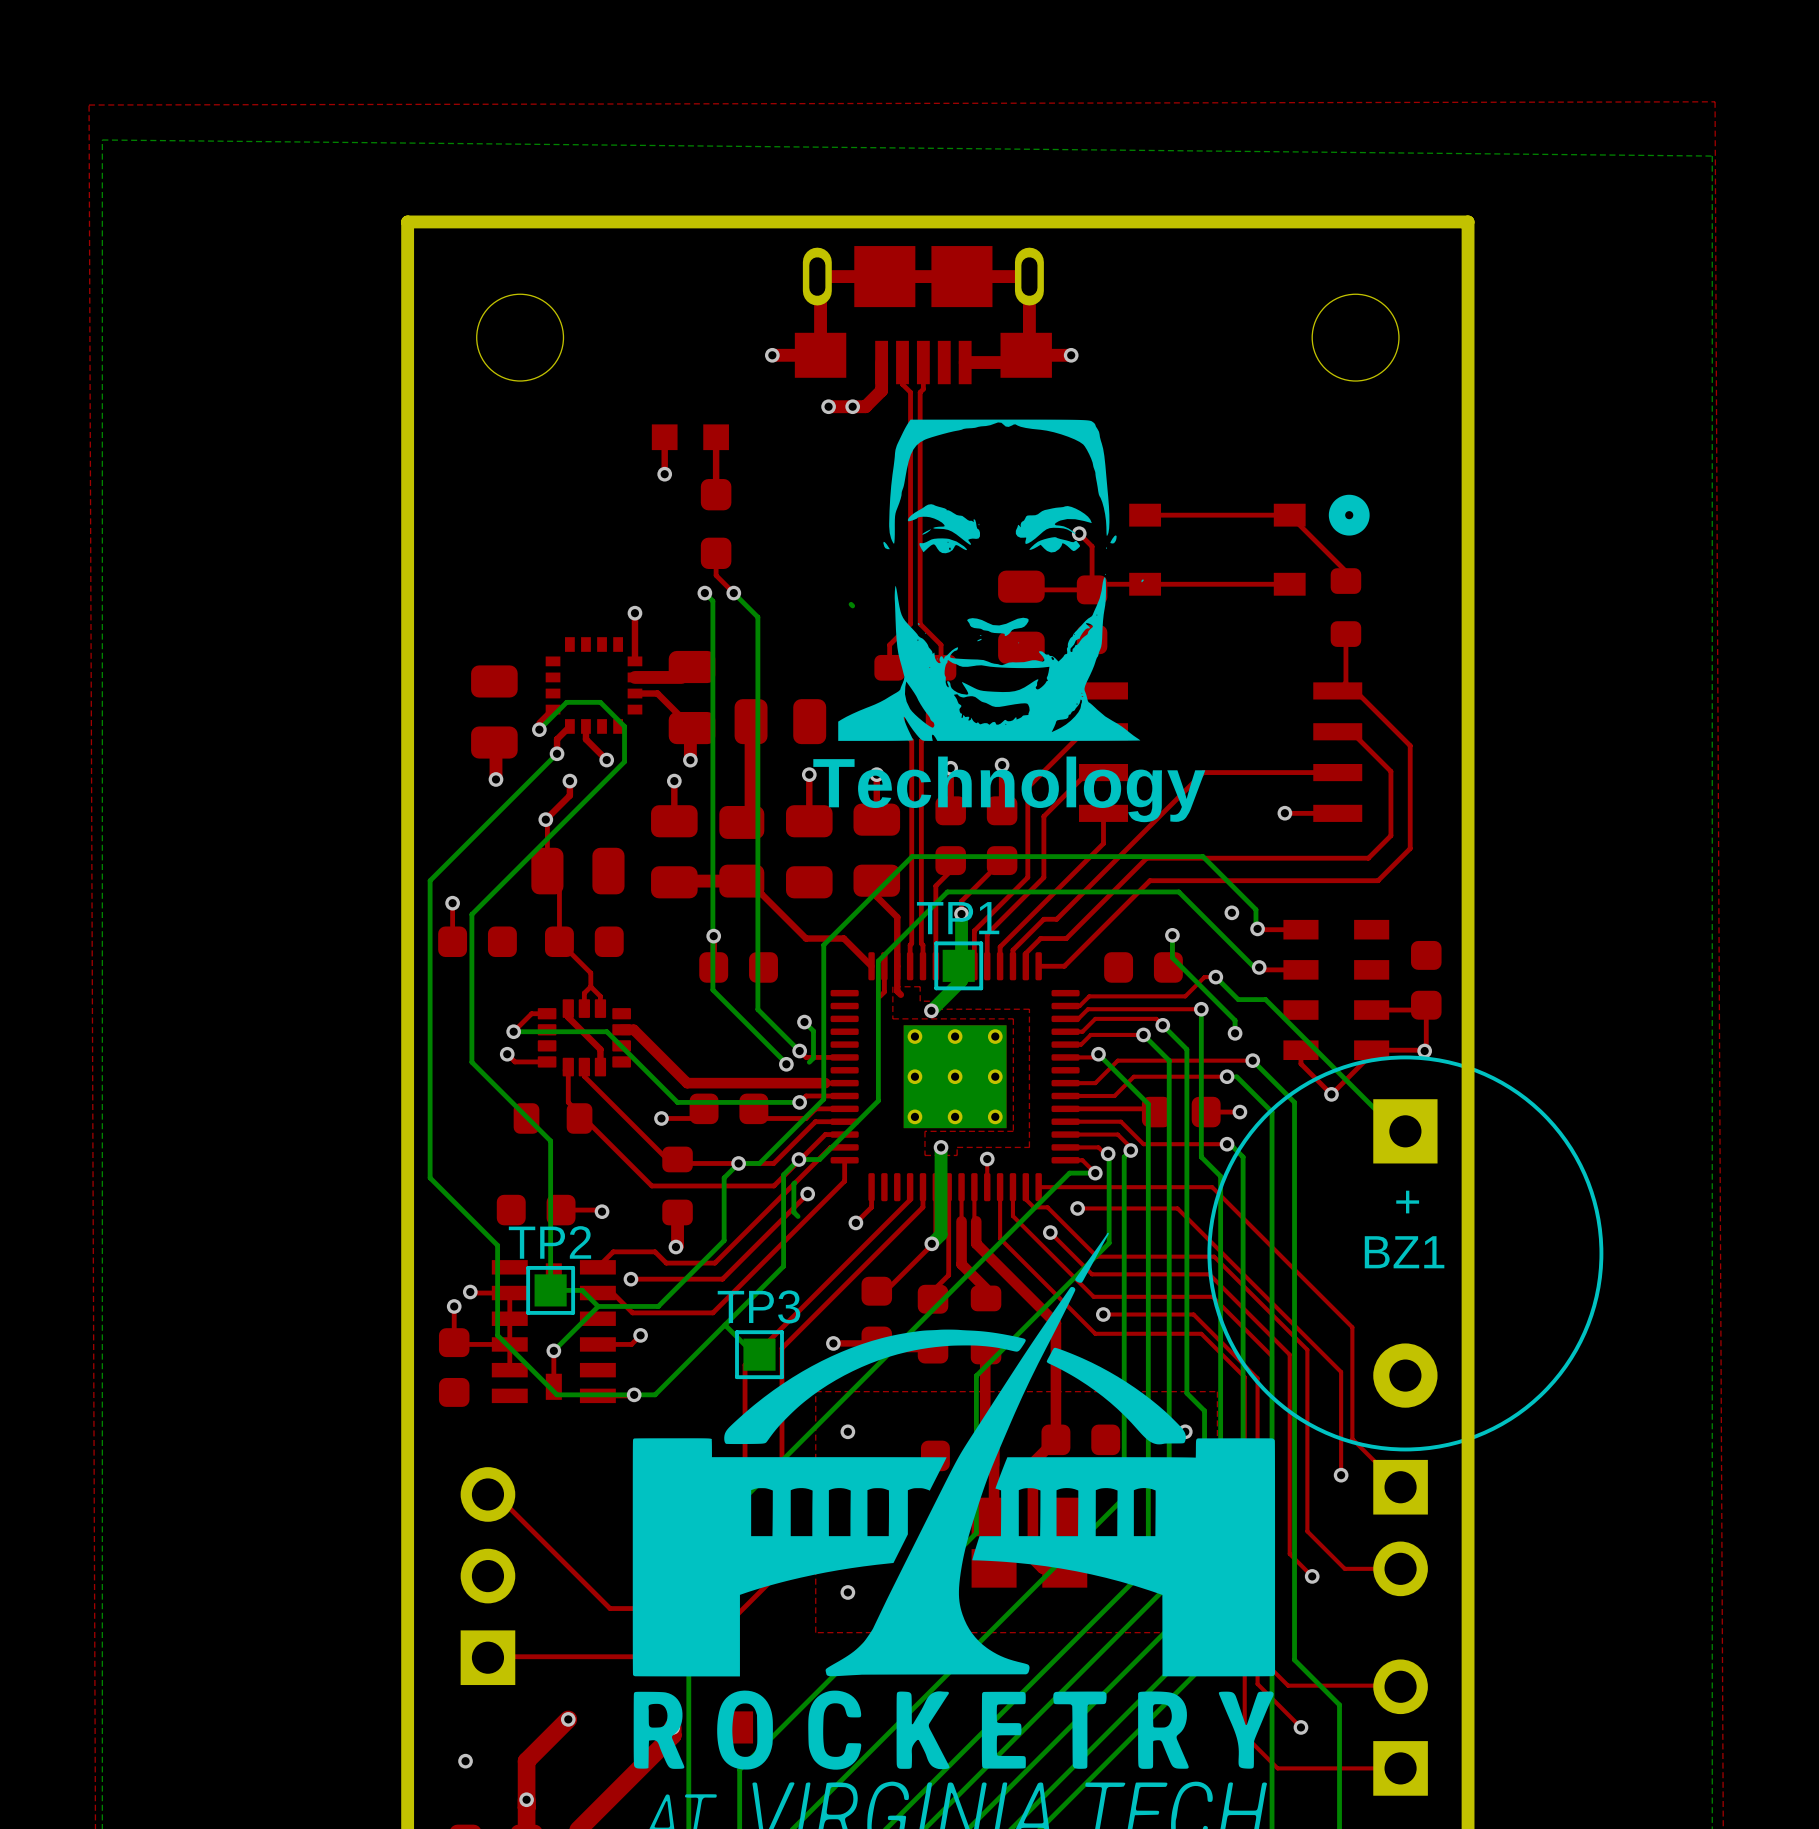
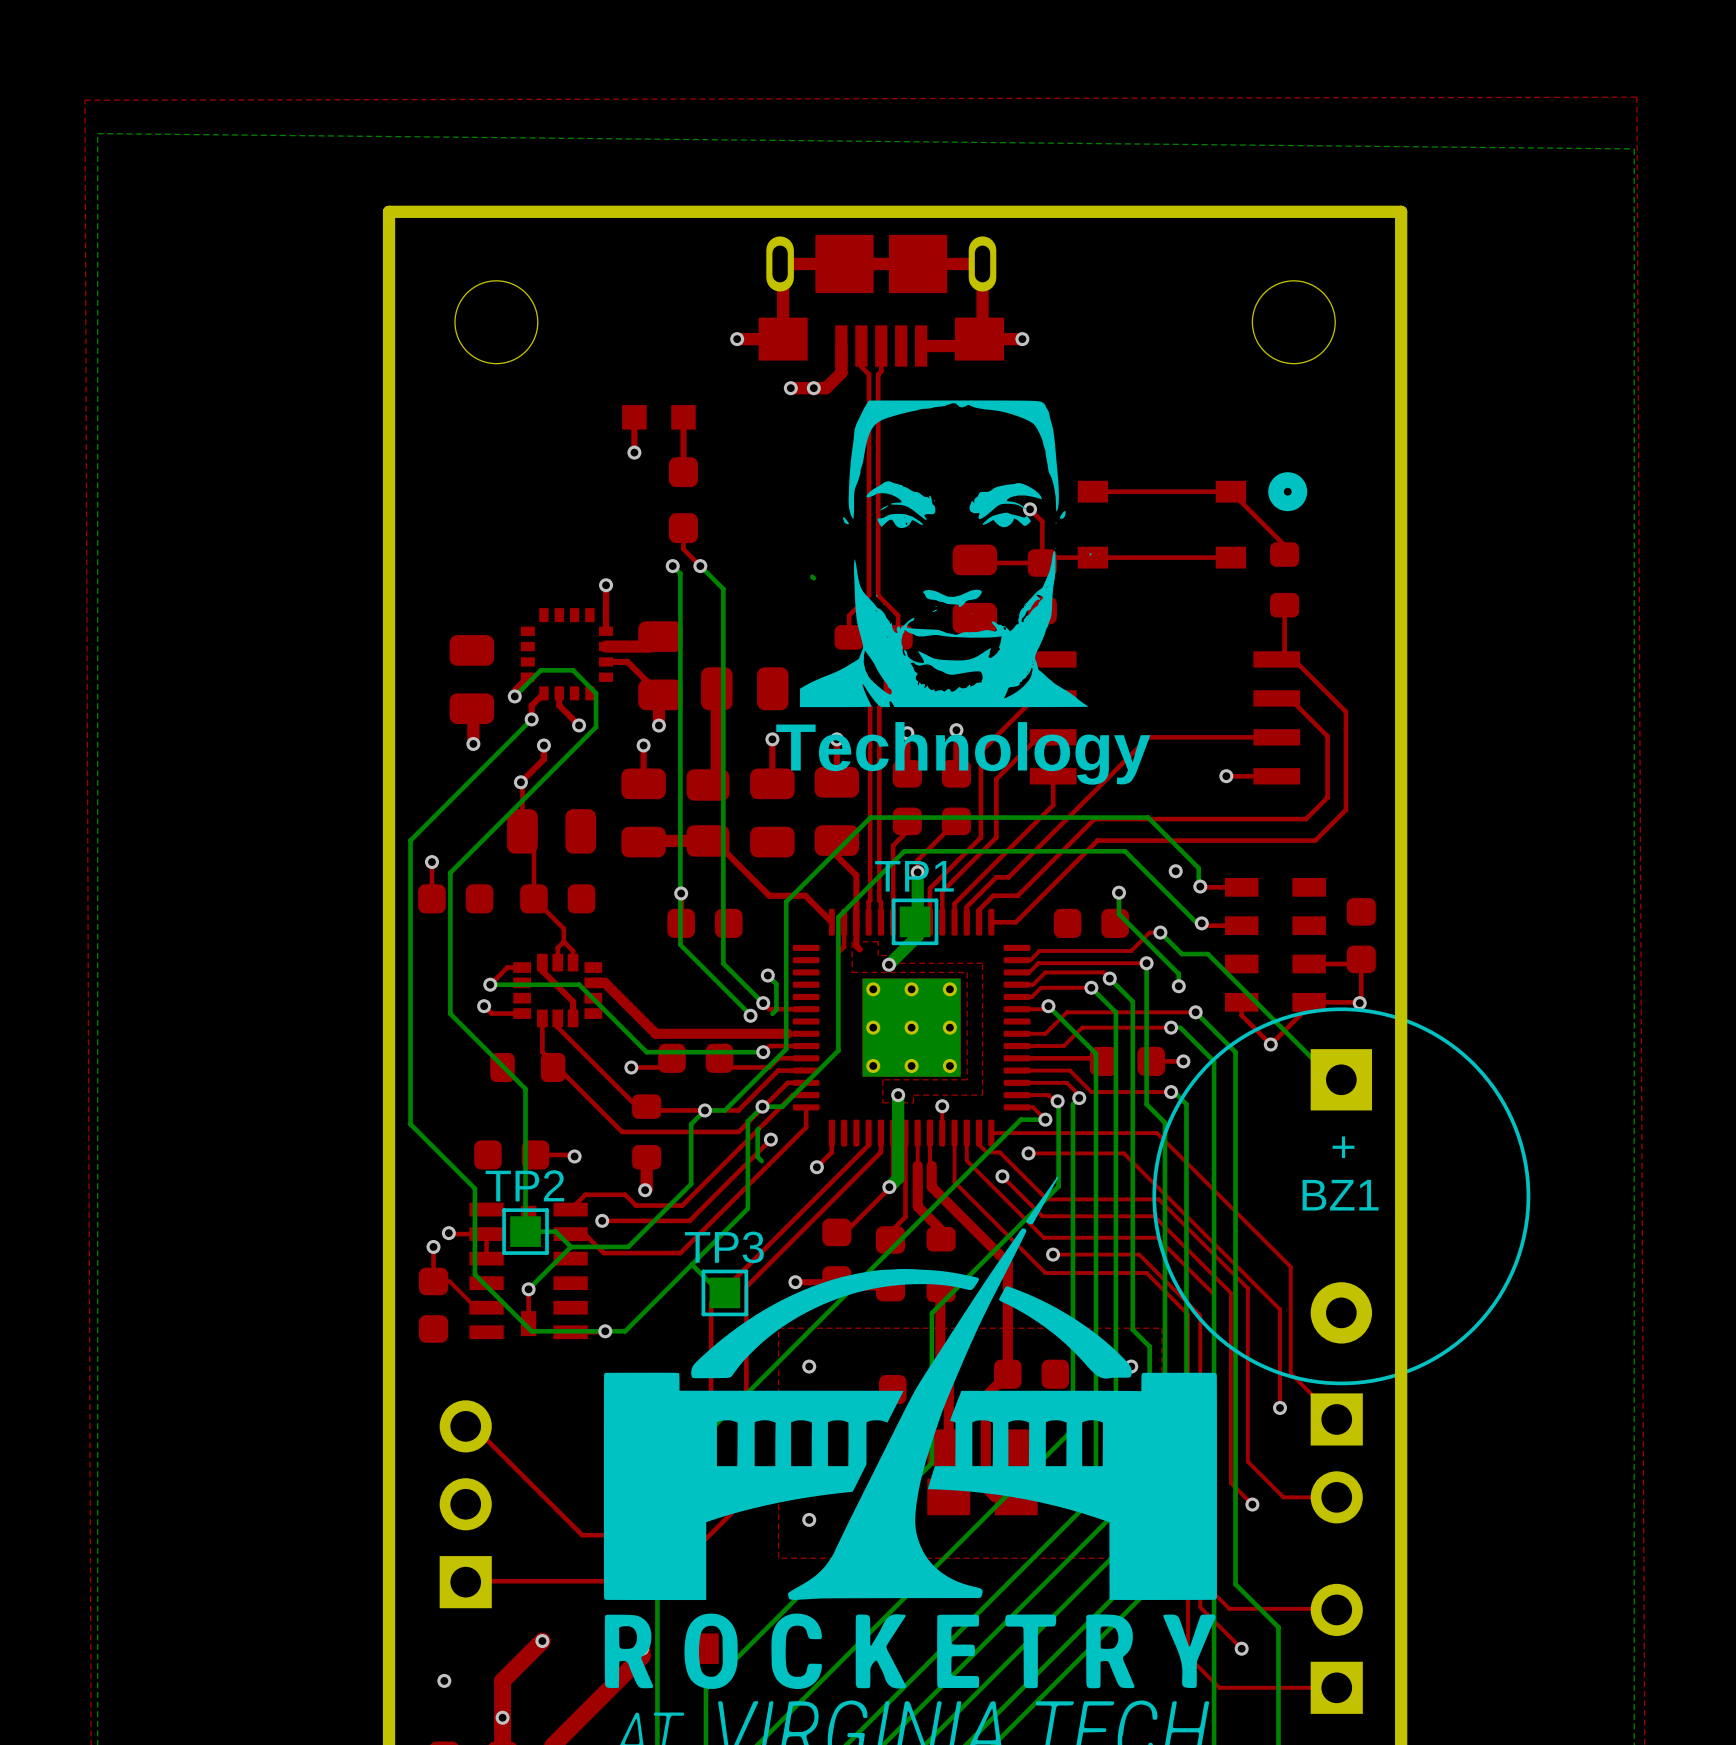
top track: (509, 1318) (509, 1370) -> (433, 1281) (449, 1281) (475, 1307) (486, 1307)
top track: (640, 1335) (631, 1344) (597, 1344) -> none
via: (640, 1335) -> none
top track: (509, 1344) (456, 1344) -> none

